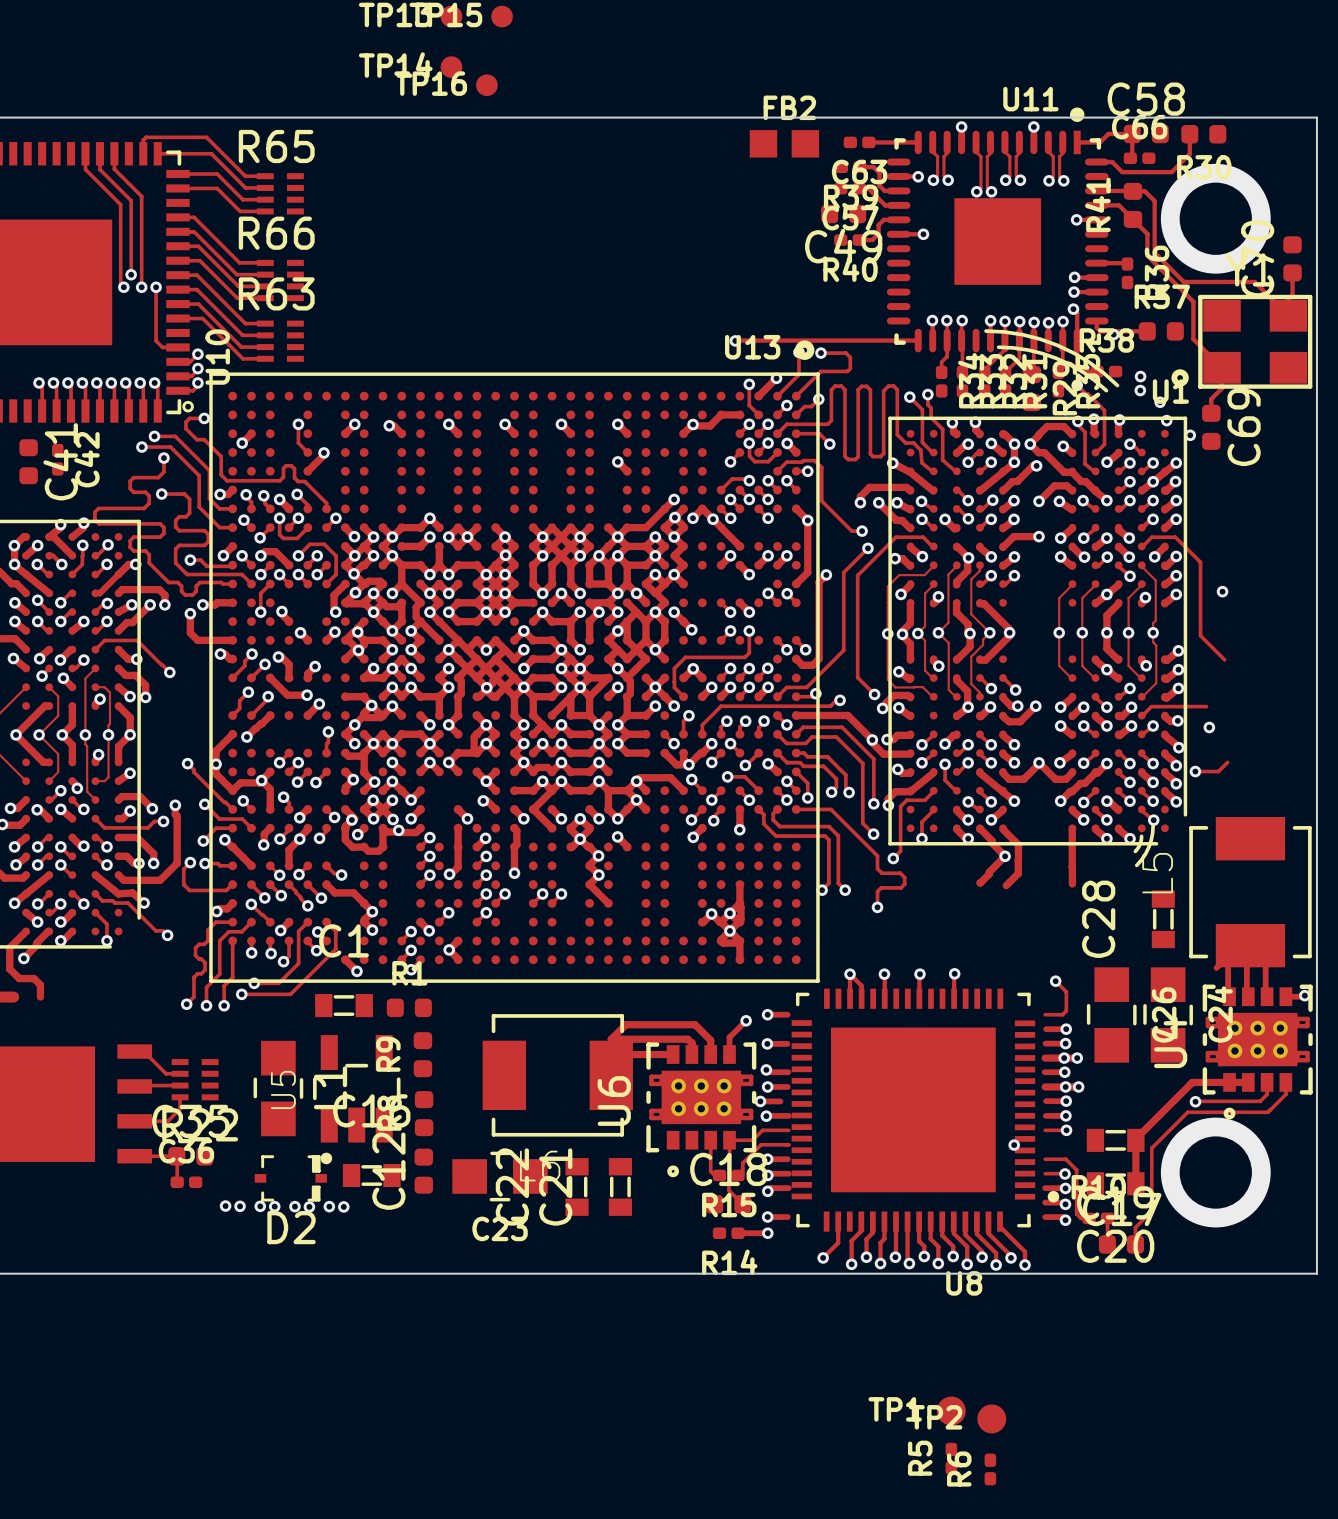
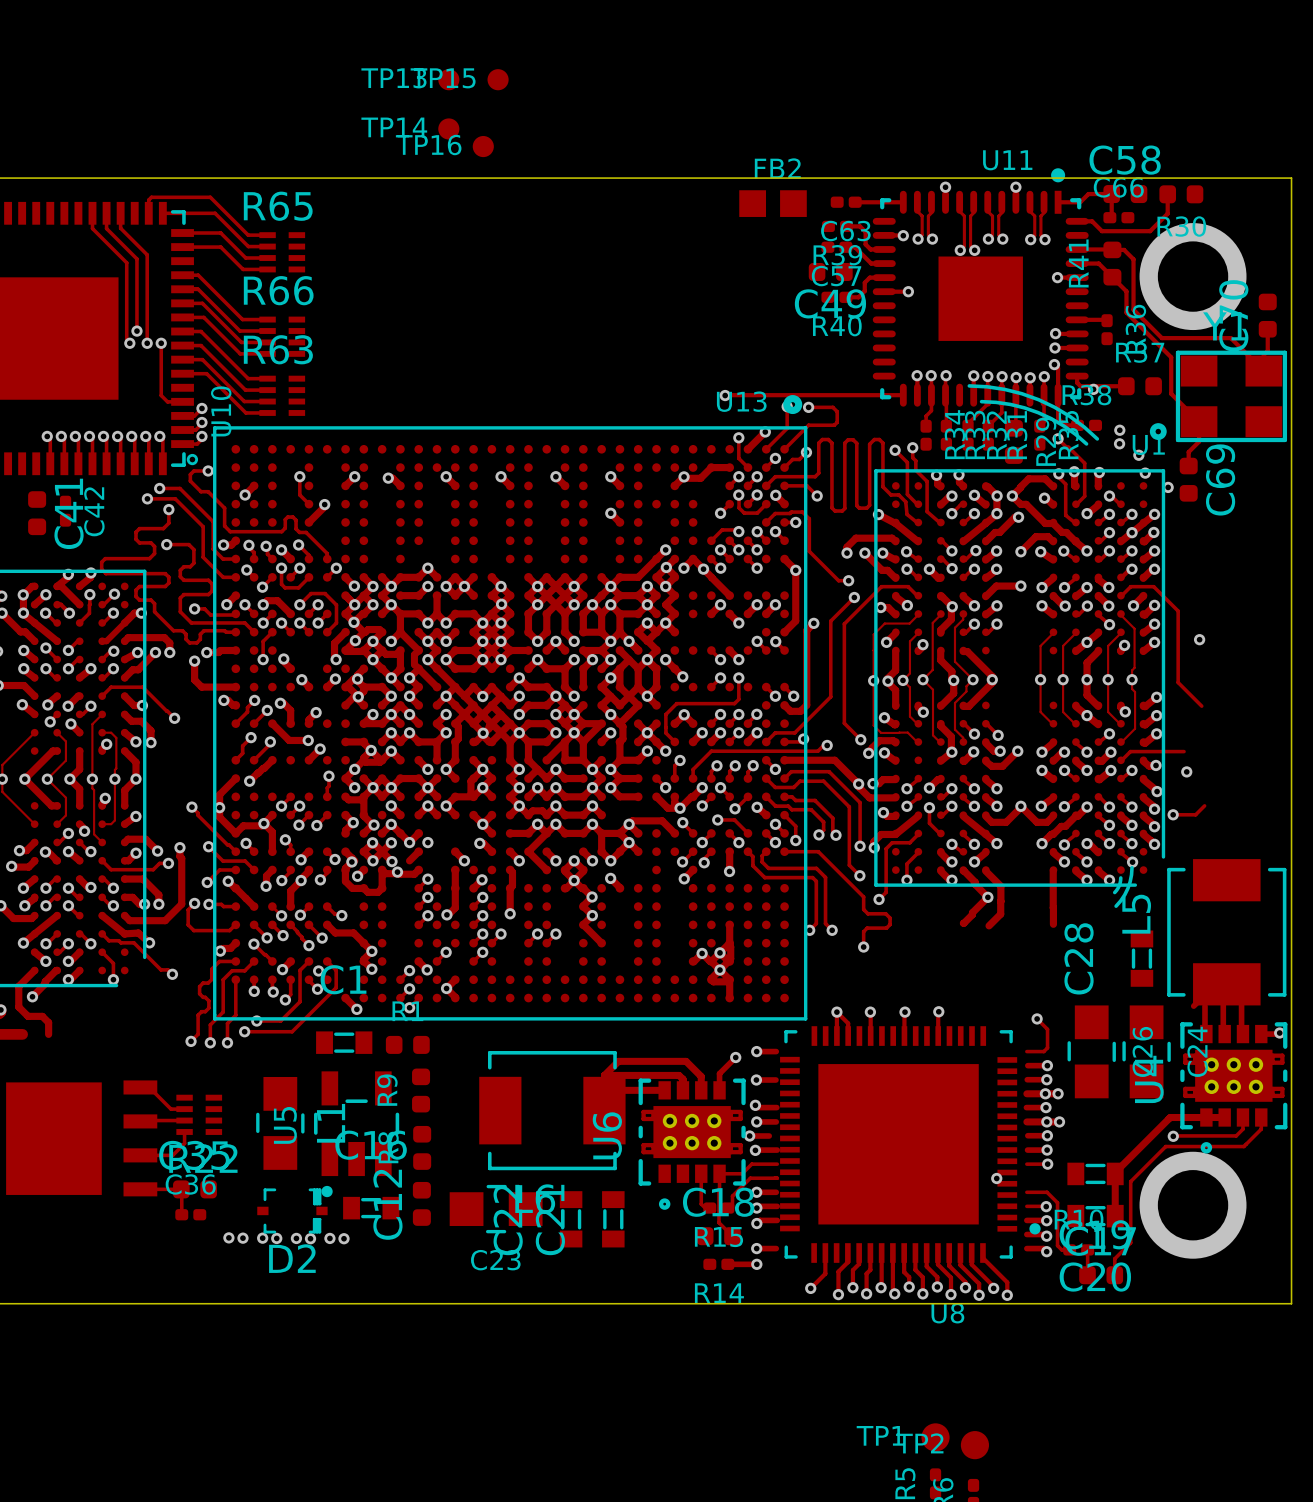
via position: (411, 818) -> (427, 842)

